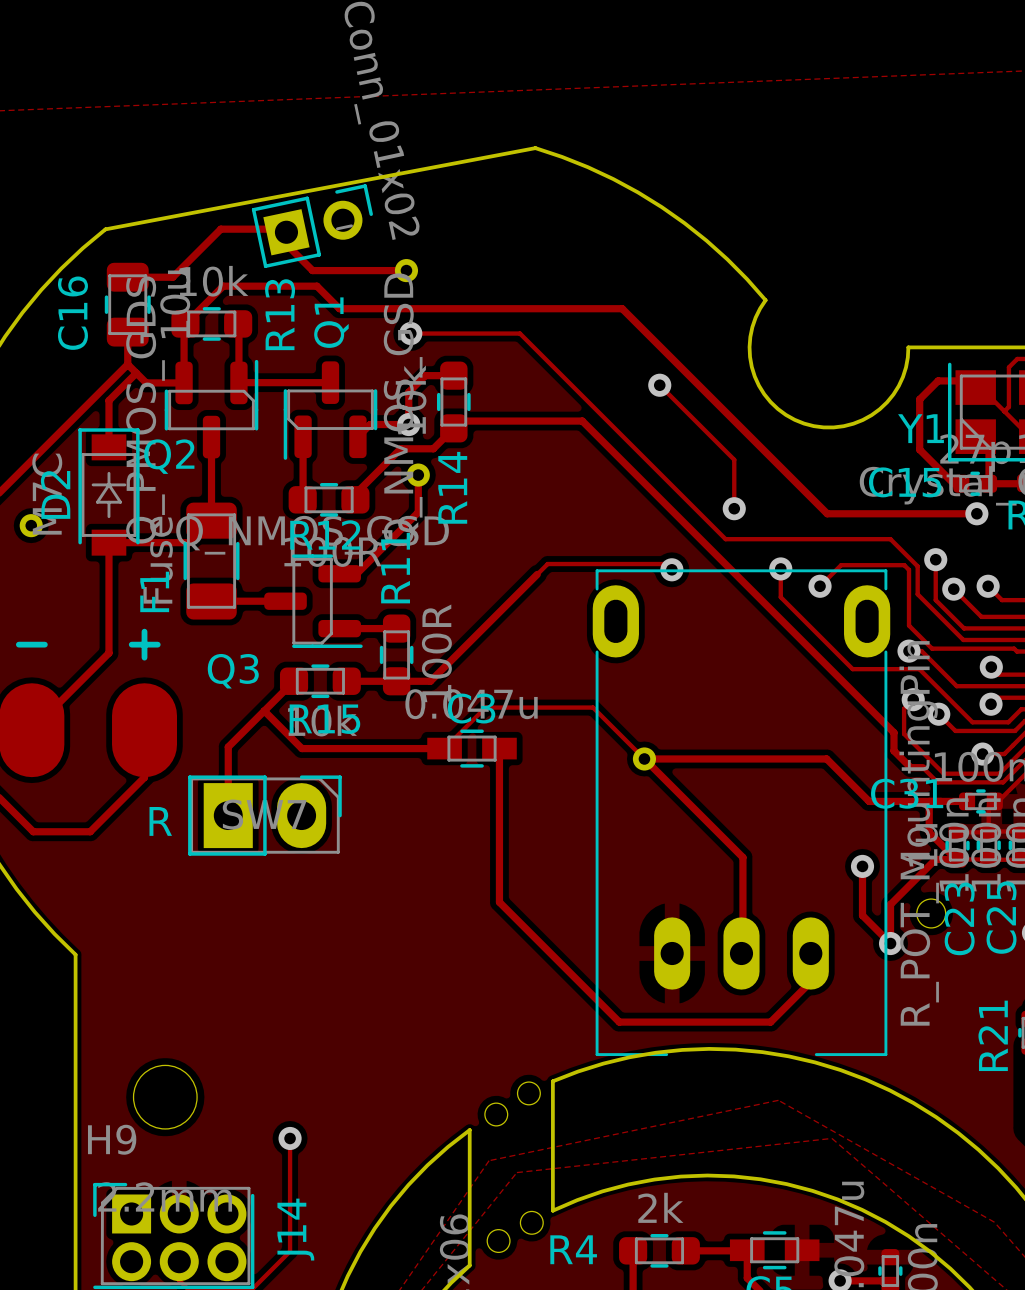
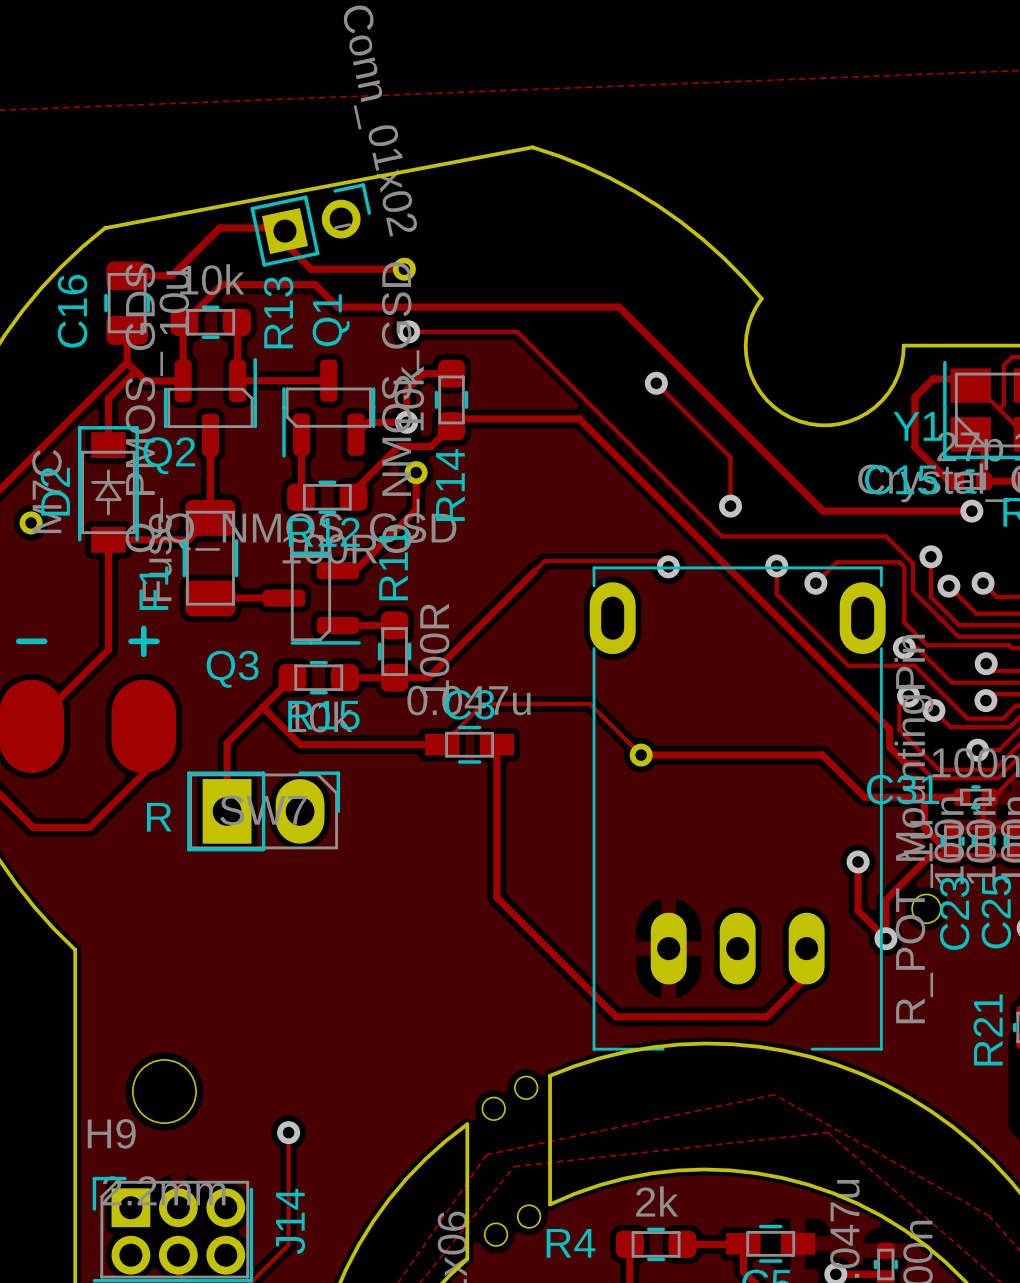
track: (644, 758) (742, 857) (742, 953) -> none

